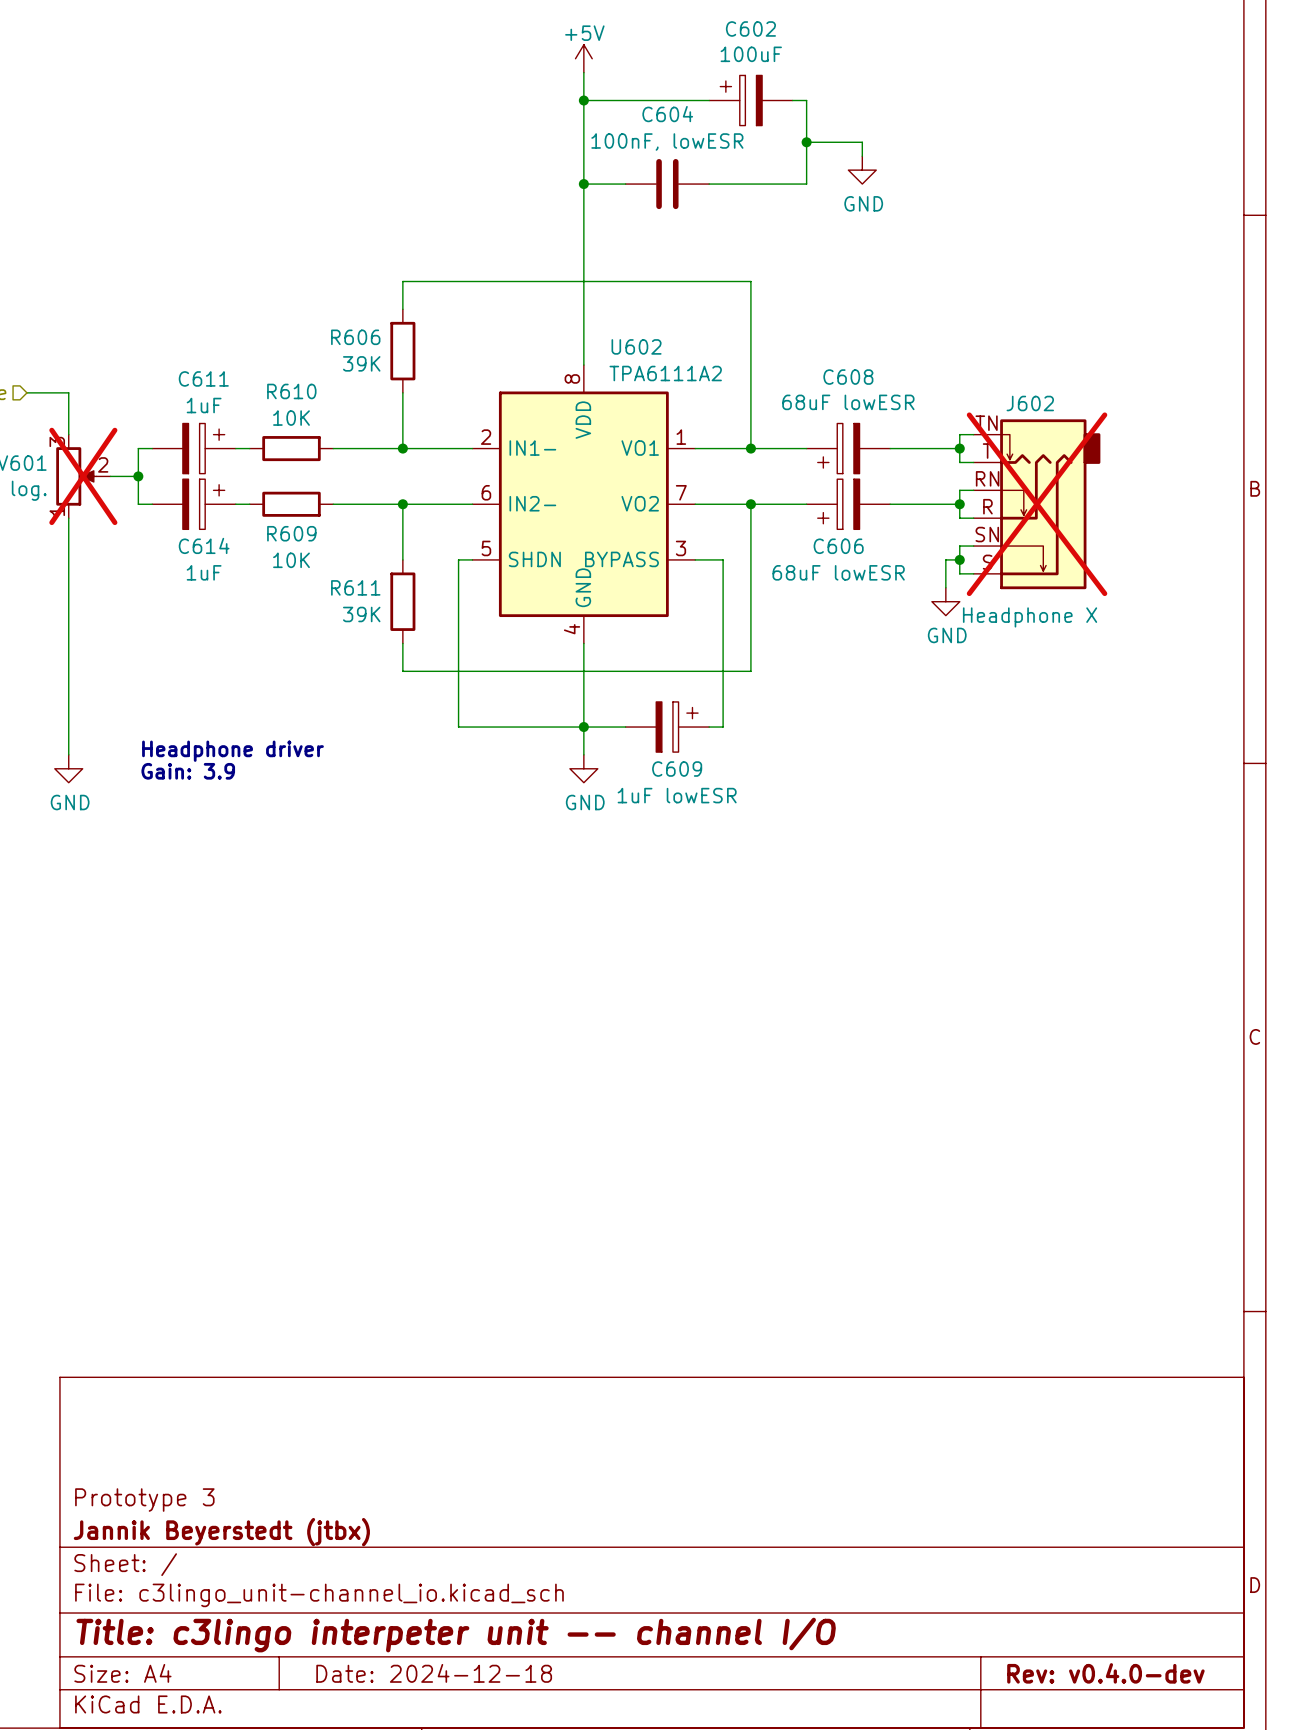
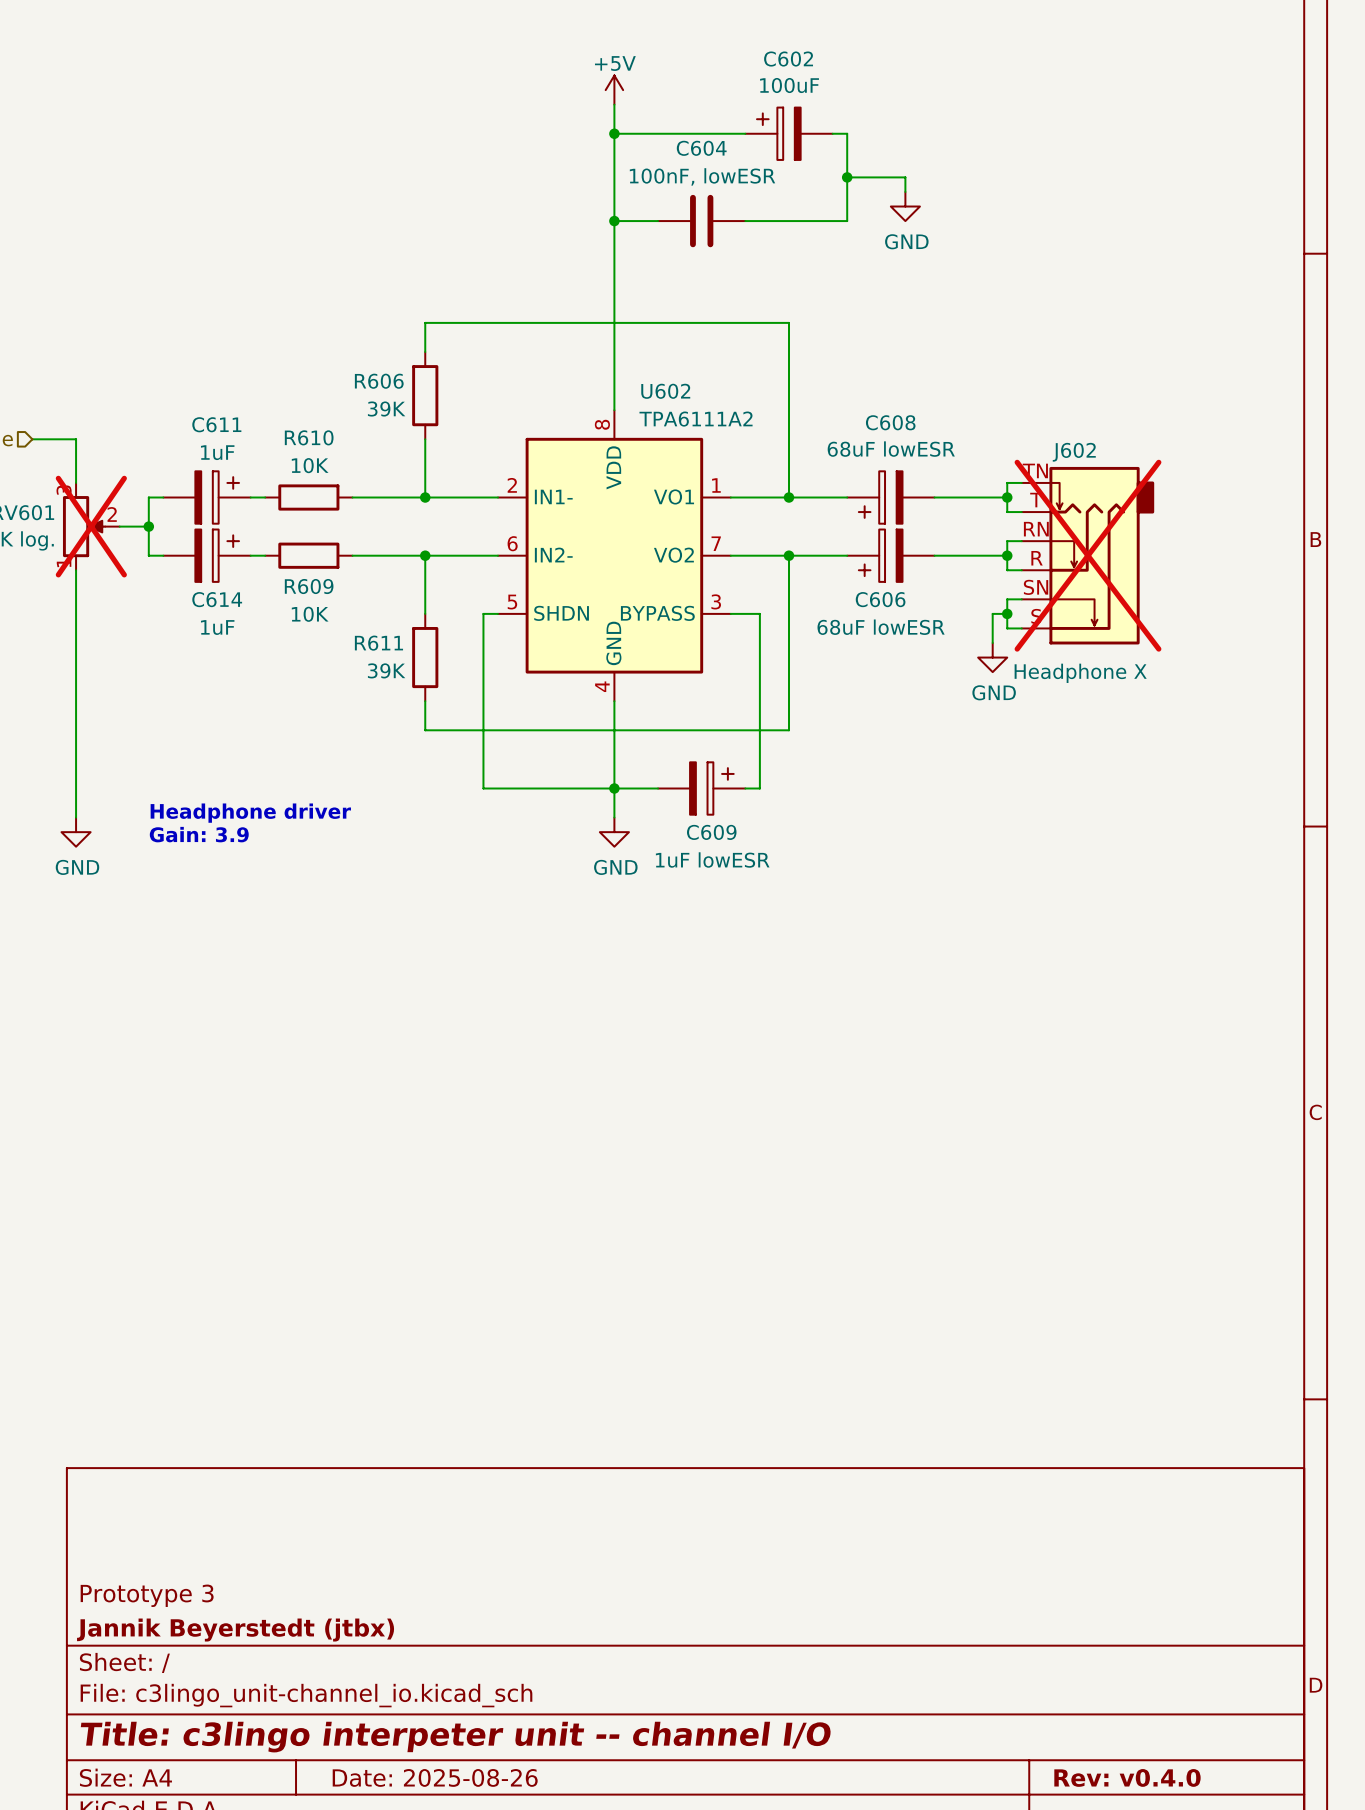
title block: Date: 2024-12-18 (434, 1673) -> Date: 2025-08-26 (435, 1777)
title block: Rev: v0.4.0-dev (1105, 1673) -> Rev: v0.4.0 (1127, 1777)

